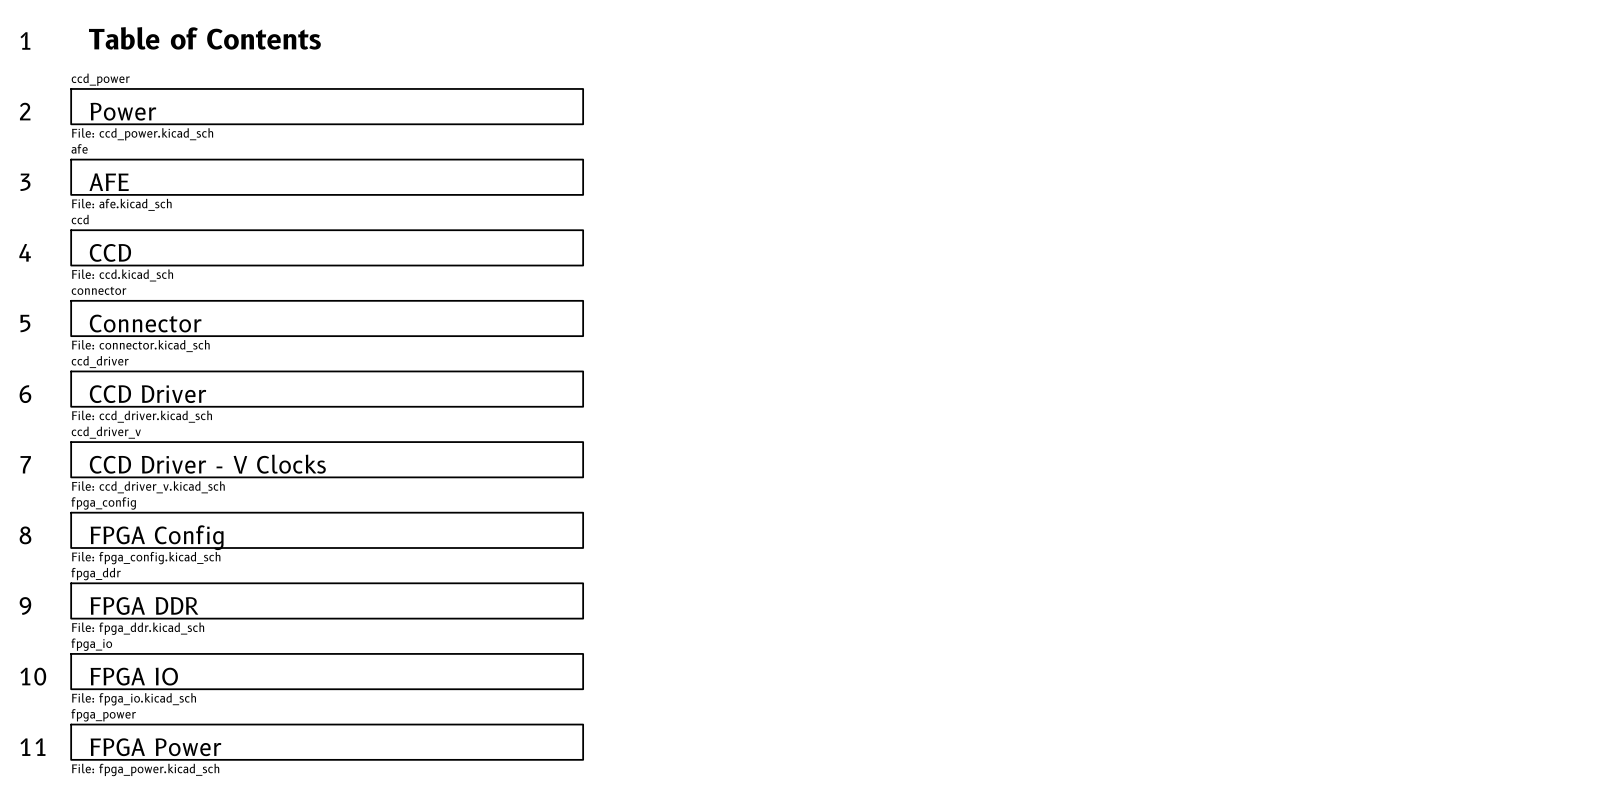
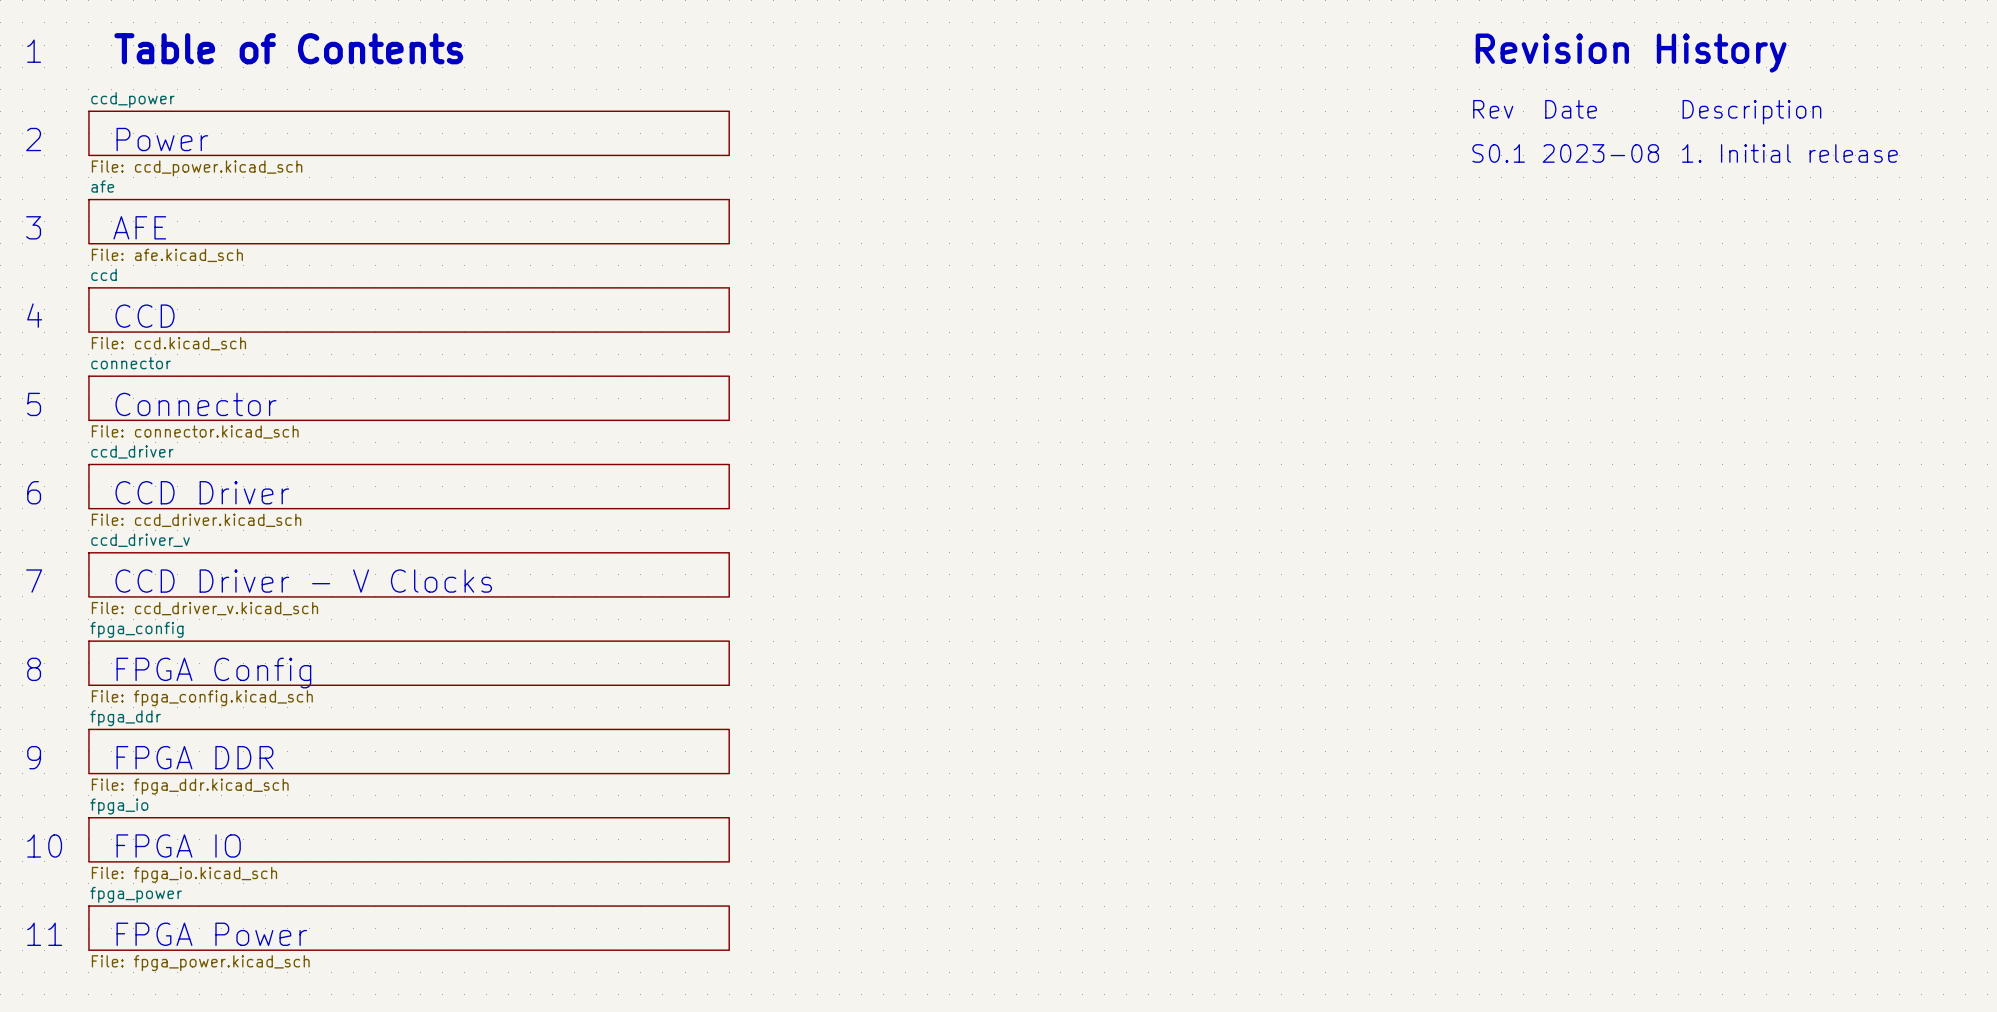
text: none -> Revision History (1631, 53)
text: none -> Rev Date Description (1647, 112)
text: none -> S0.1 2023-08 (1565, 153)
text: none -> 1. Initial release (1789, 153)

